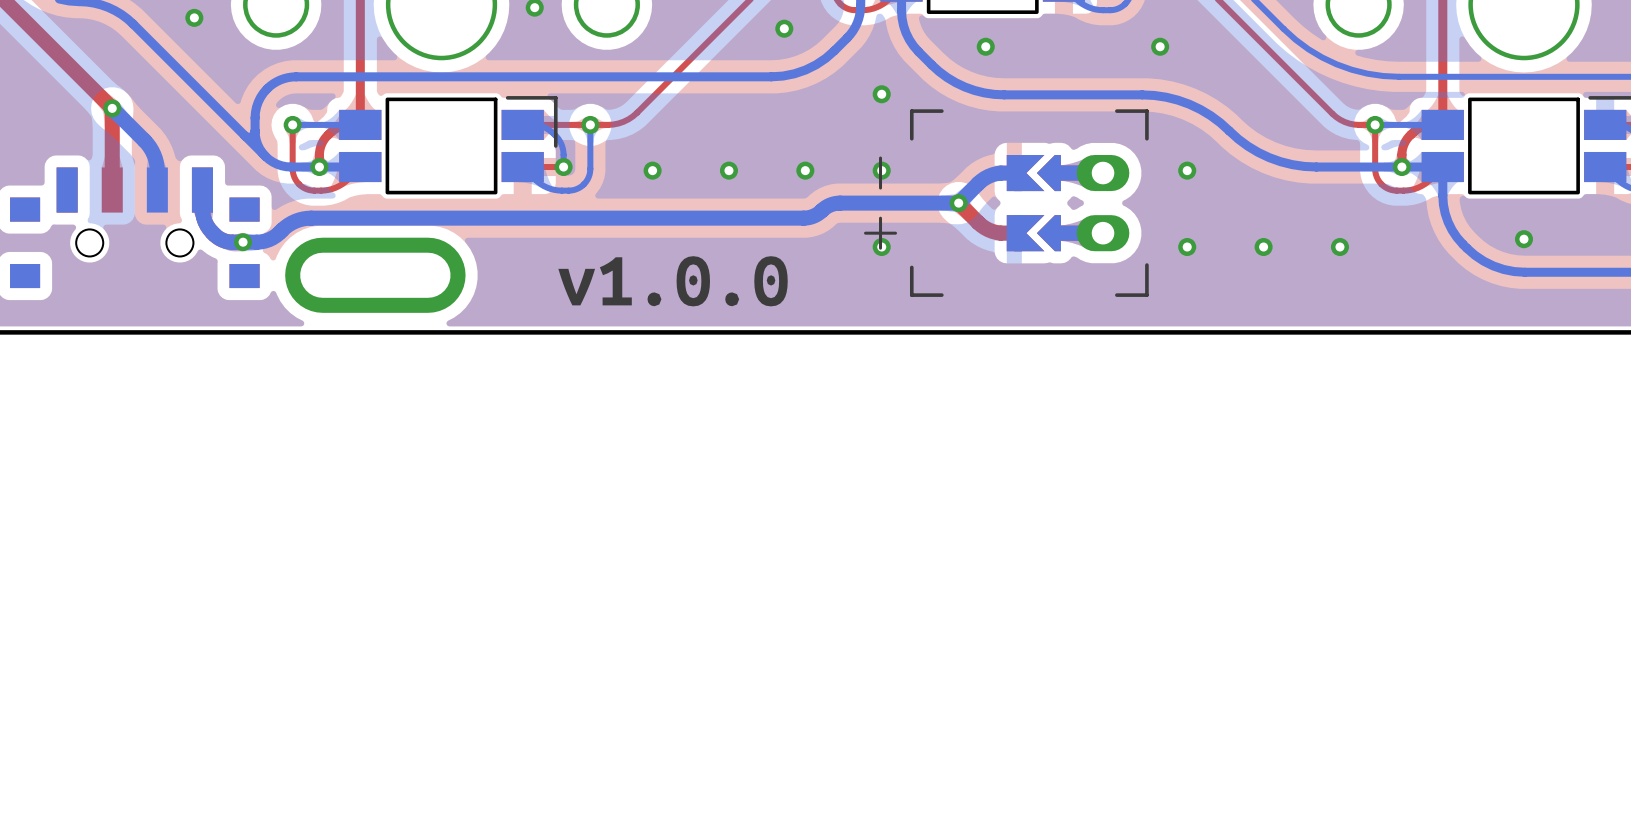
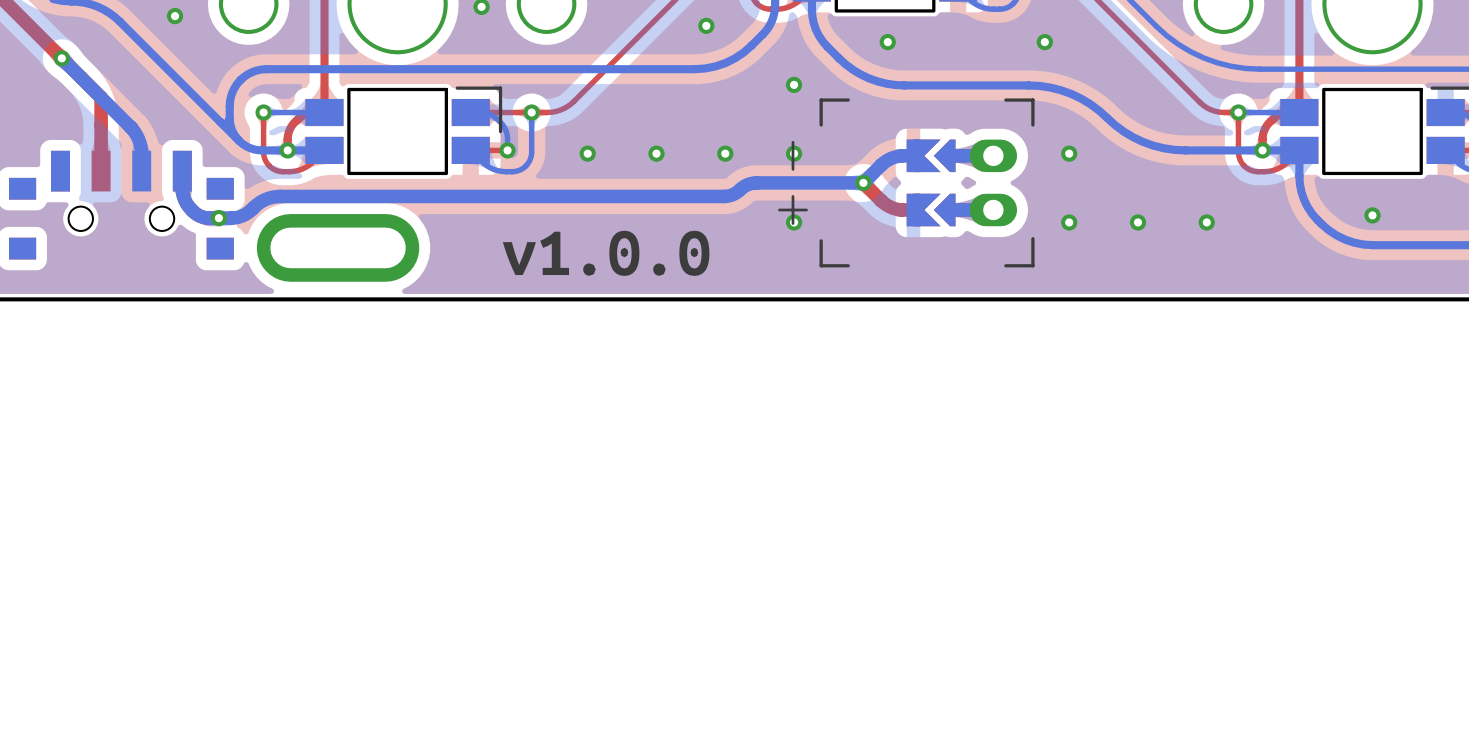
via position: (112, 108) -> (61, 58)

